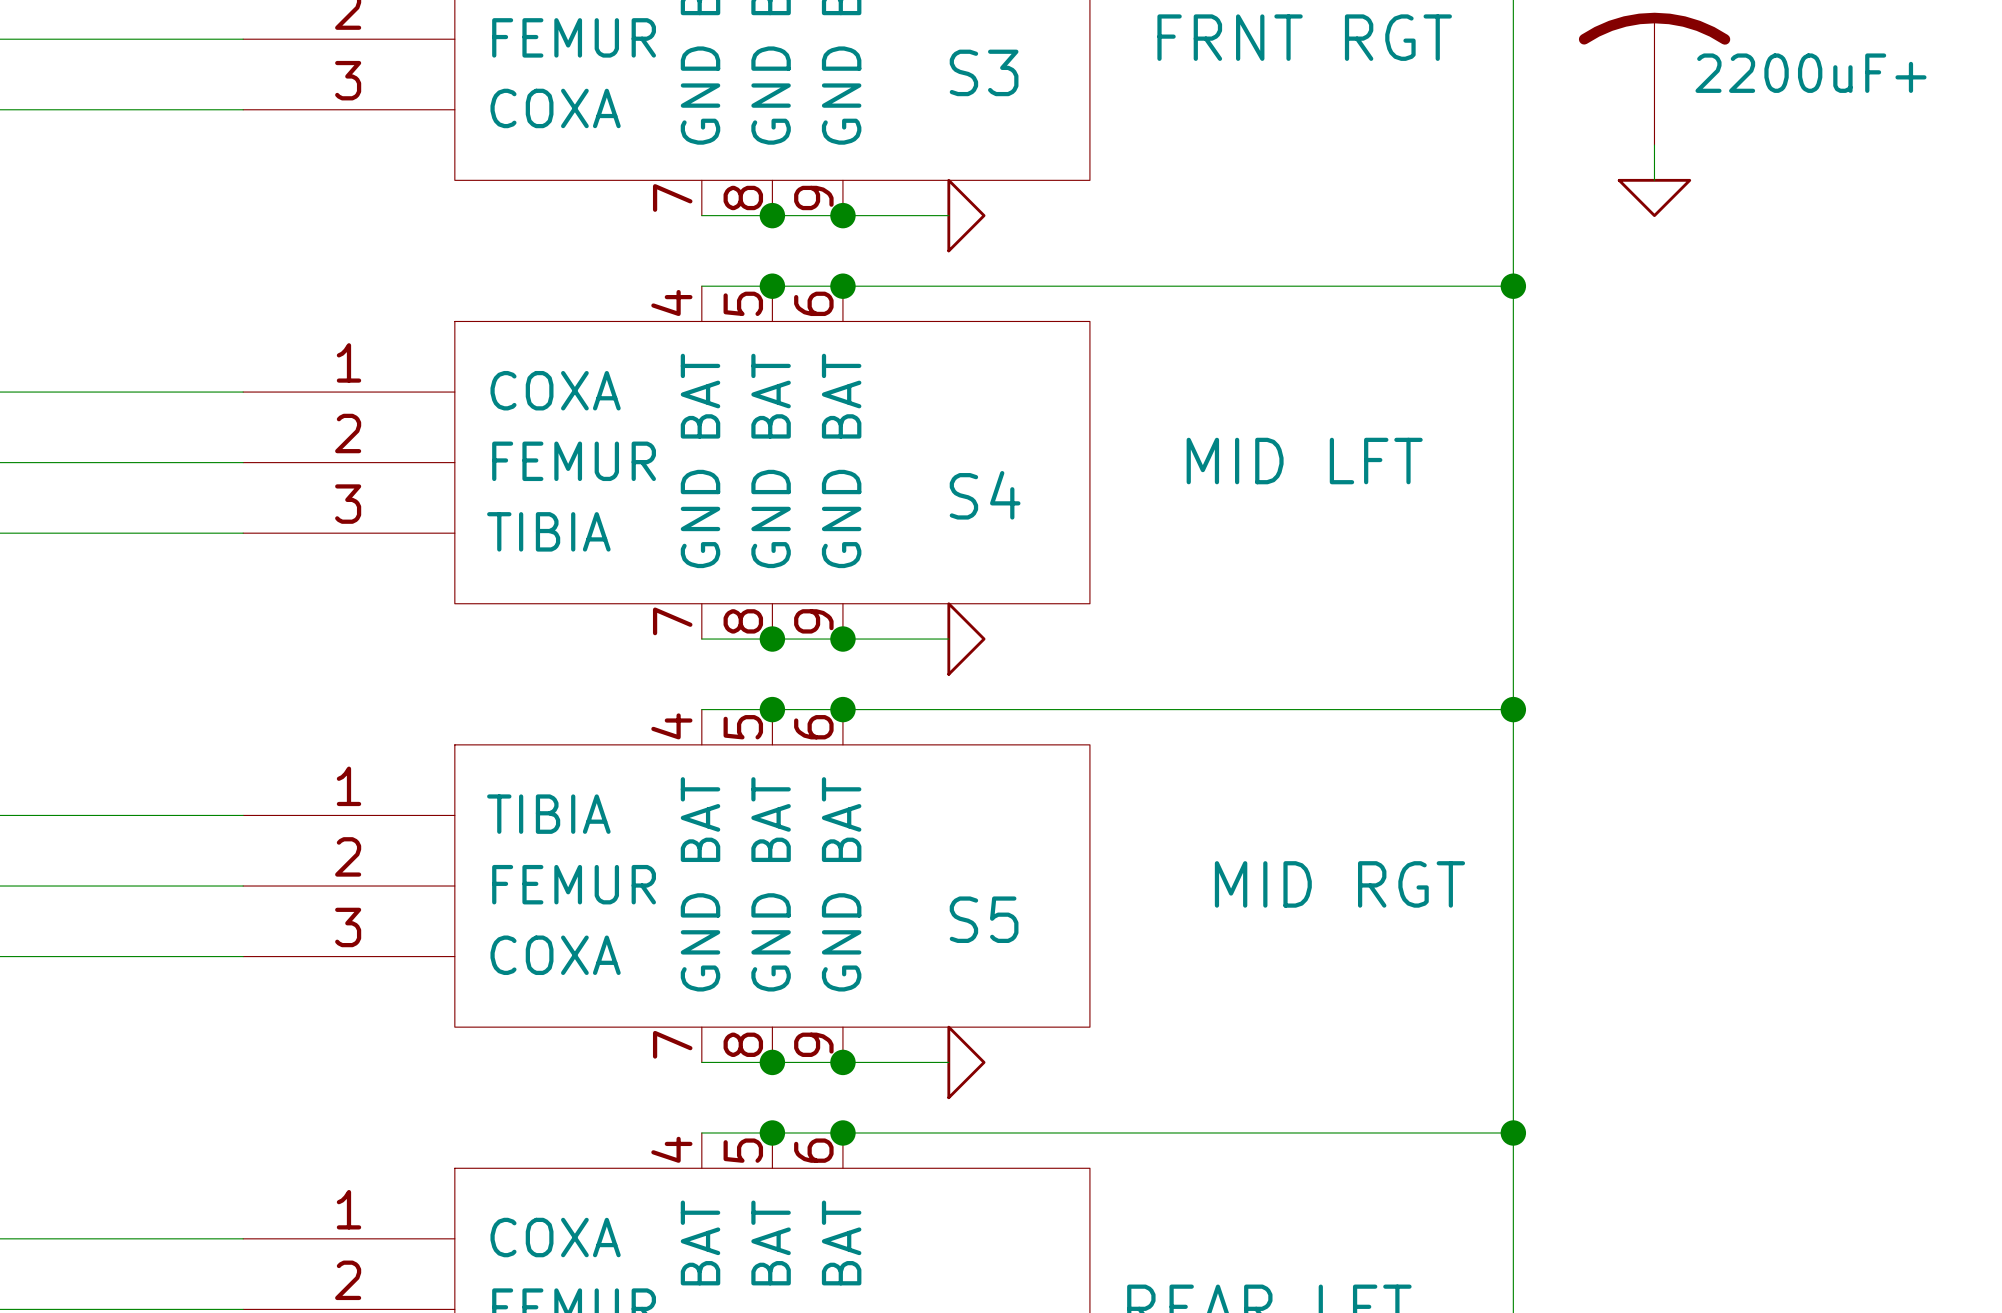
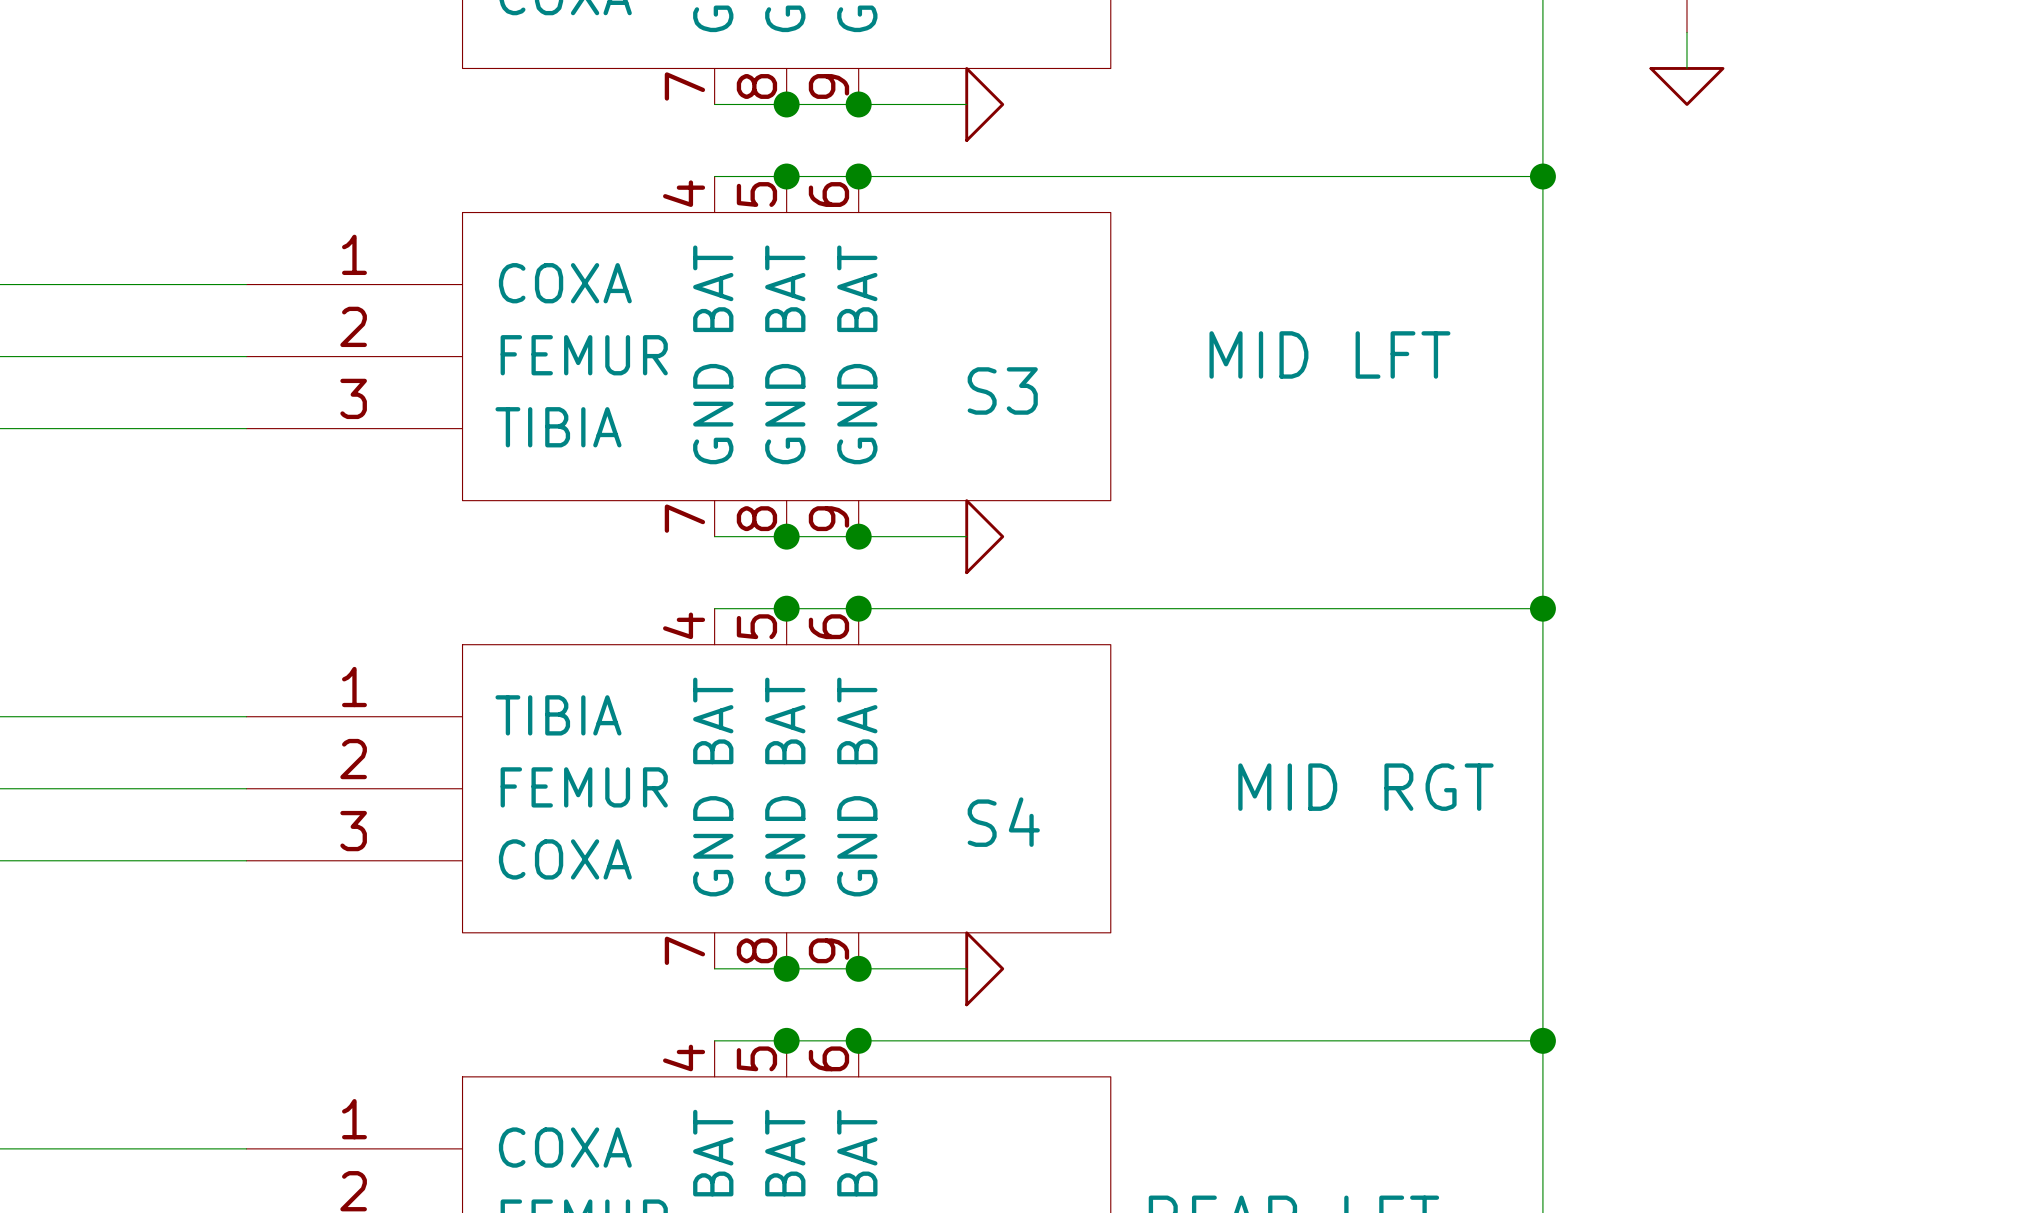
S4 name: S4 (985, 495) -> S3 (1002, 390)
S5 name: S5 (984, 919) -> S4 (1003, 822)

